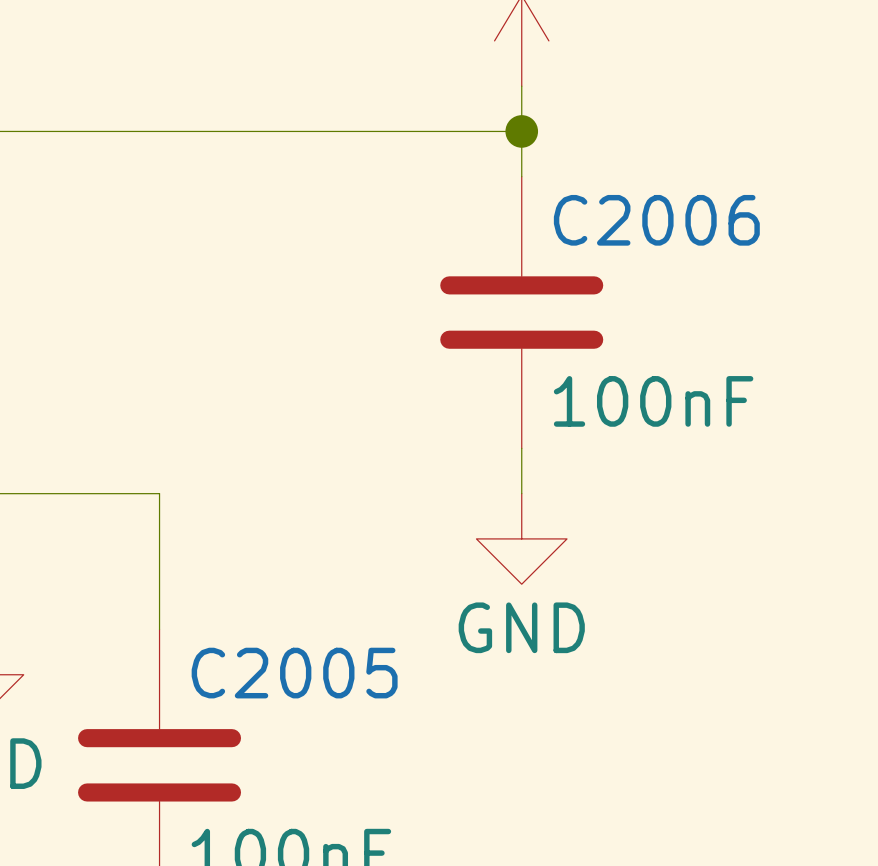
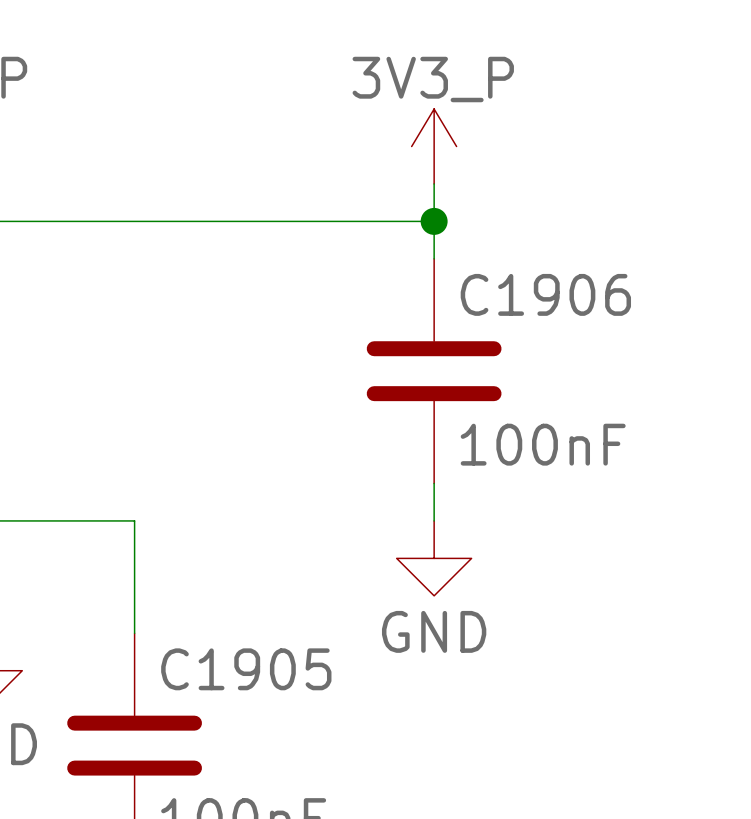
C2006 name: C2006 (656, 220) -> C1906 (545, 294)
C2005 name: C2005 (294, 673) -> C1905 (246, 669)

